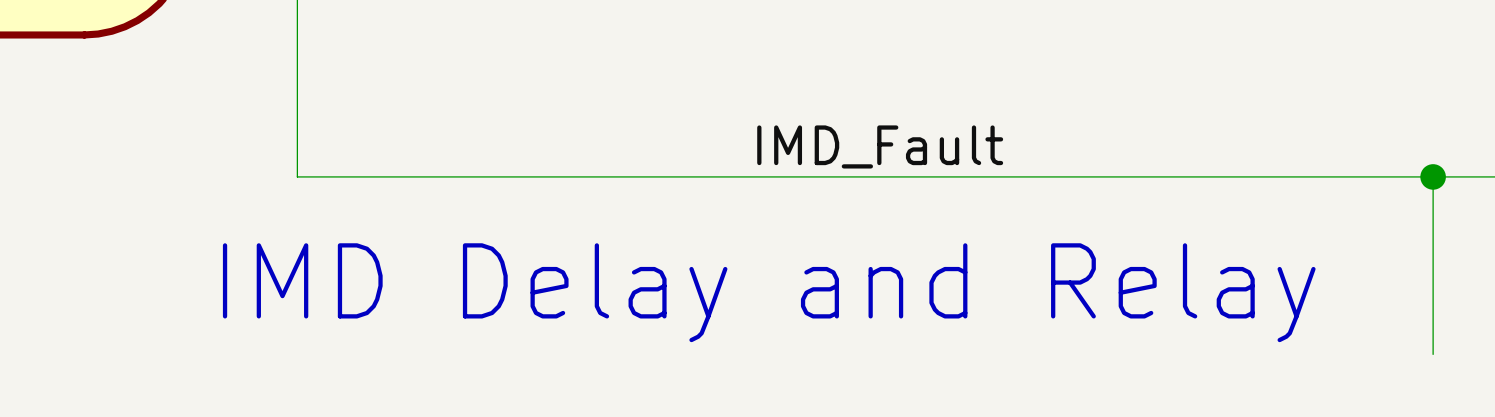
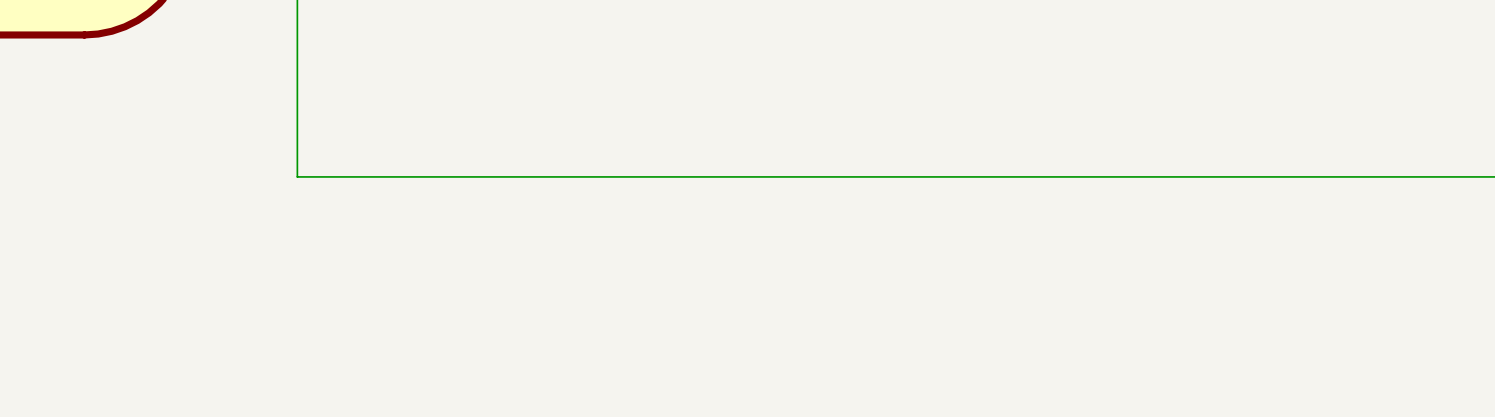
label: IMD_Fault (880, 146) -> none
wire: (1433, 176) (1433, 354) -> none
junction: (1433, 176) -> none
text: IMD Delay and Relay (769, 292) -> none

